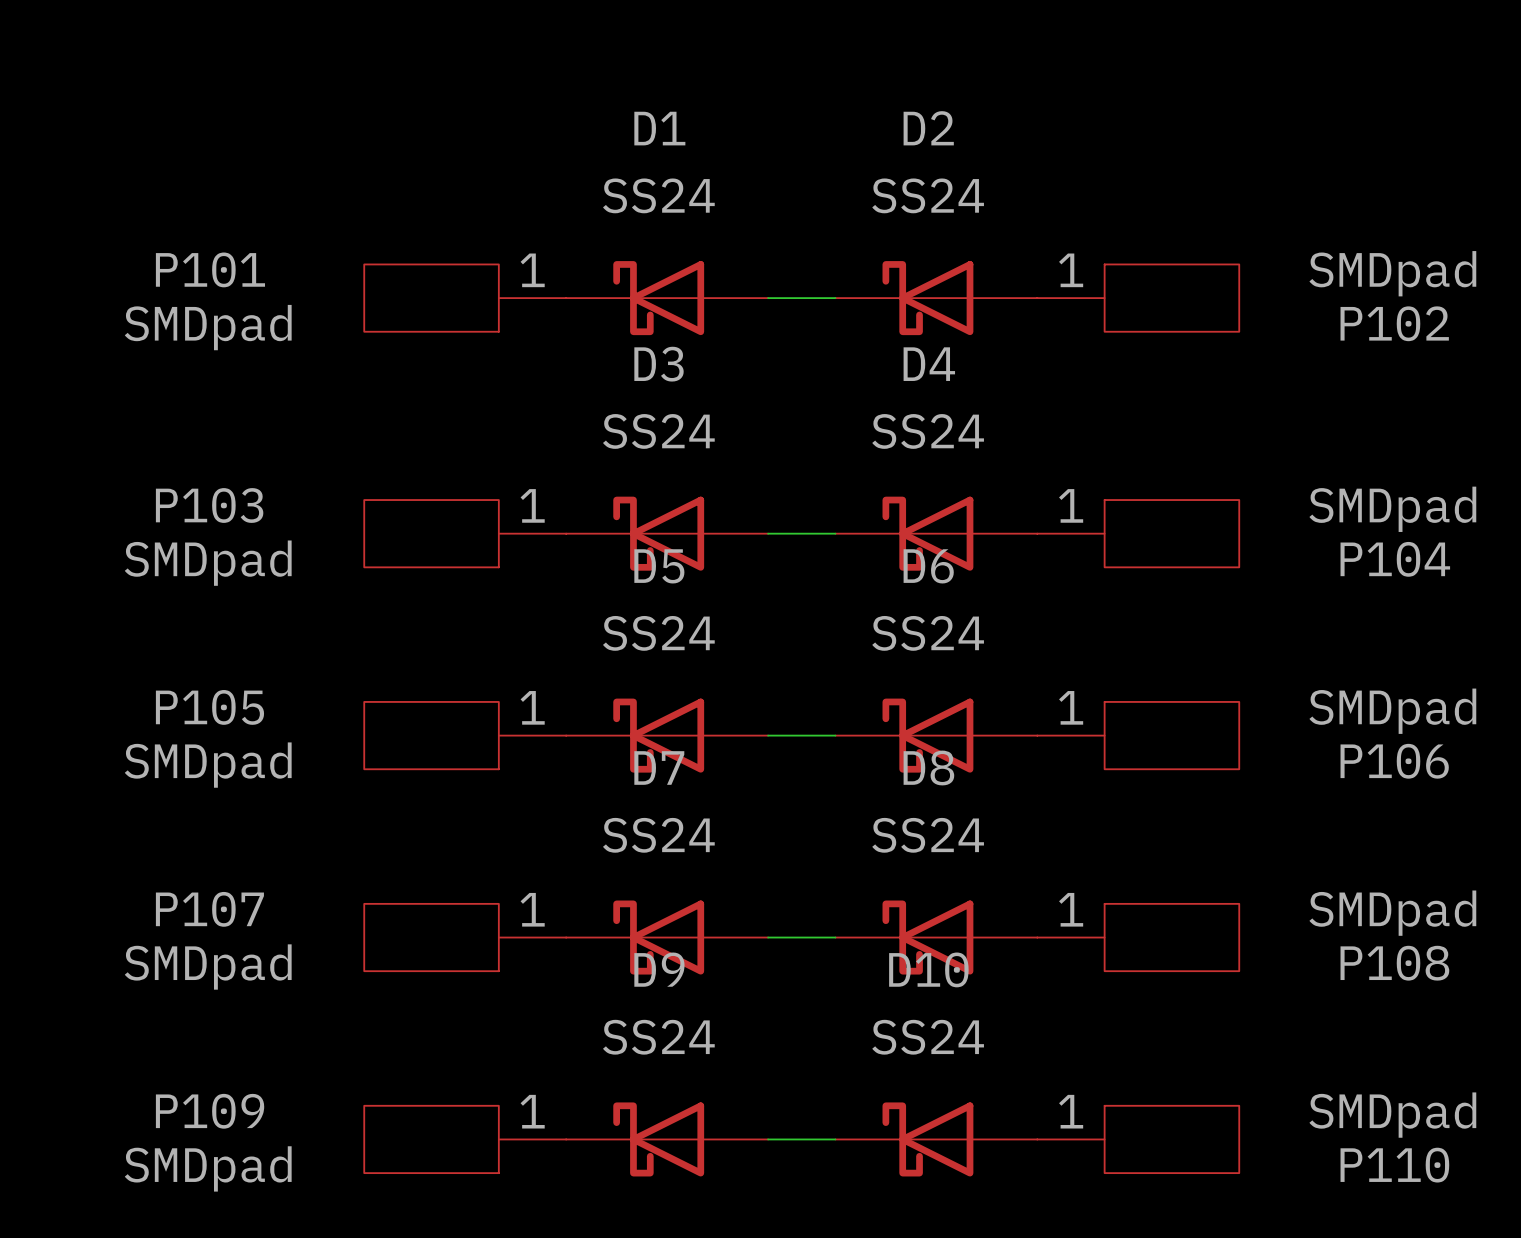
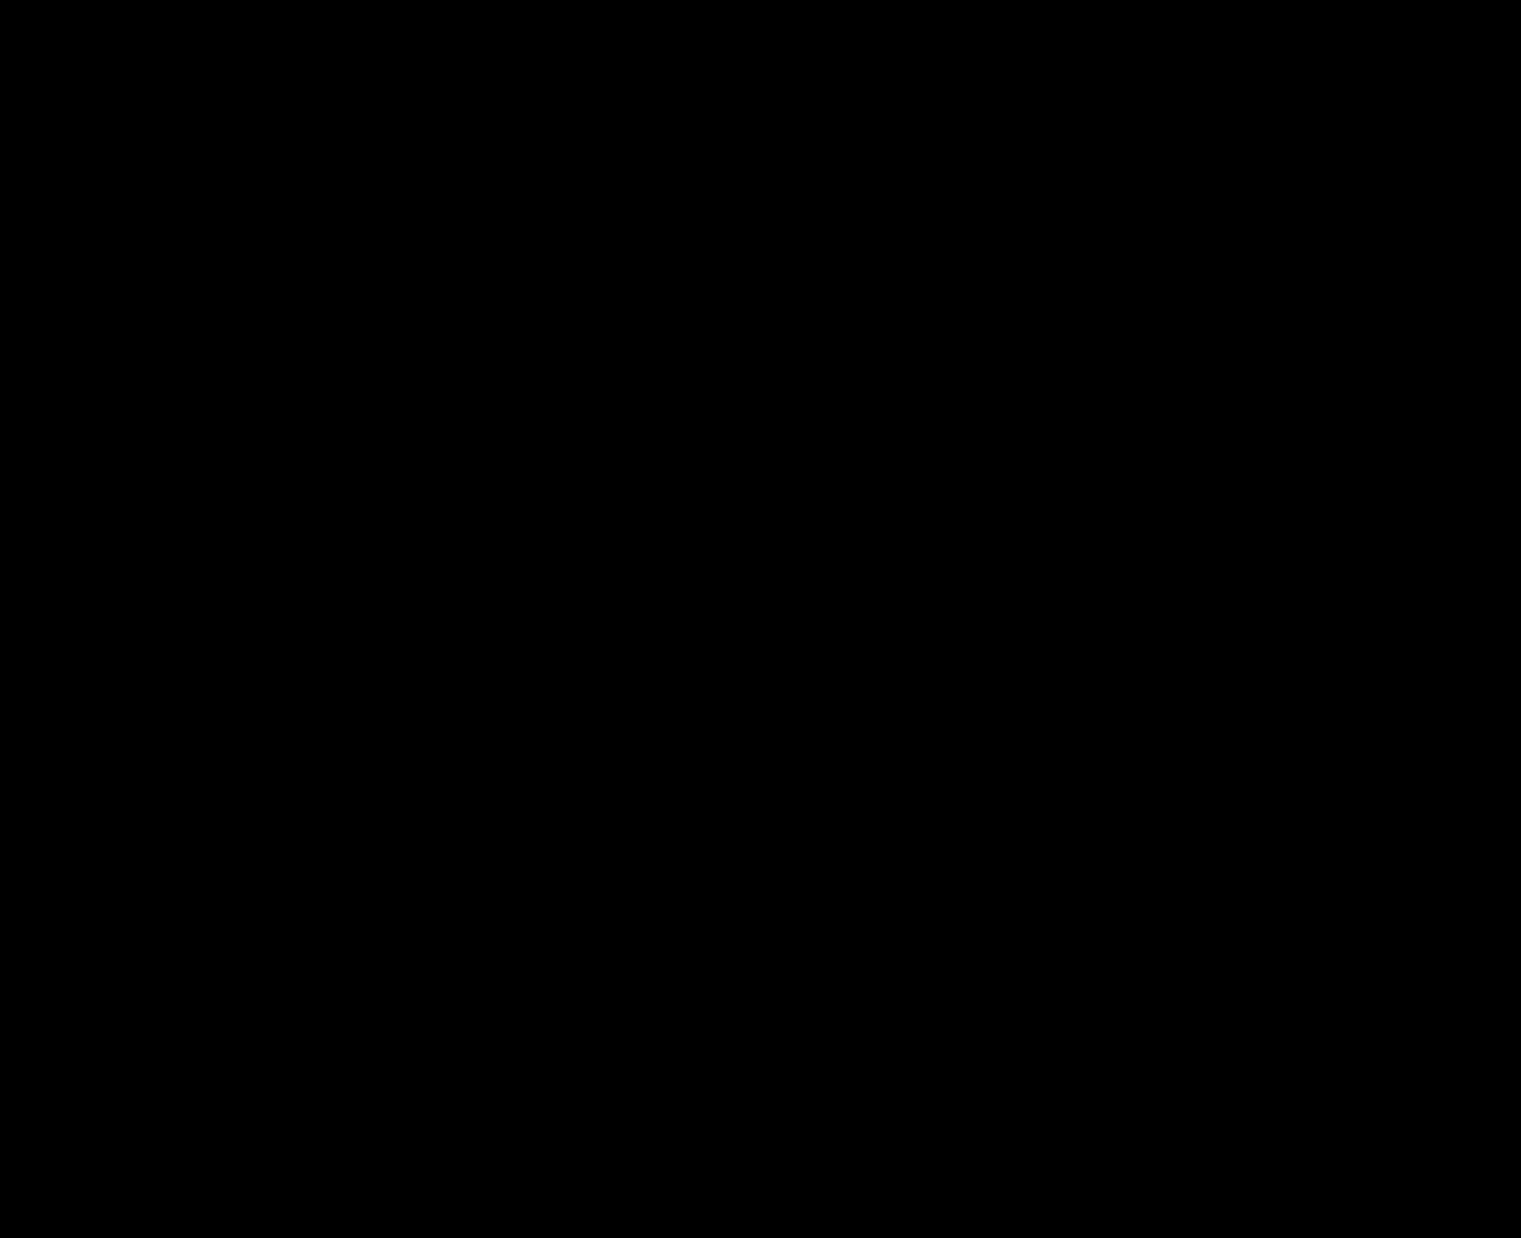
P101: SMDpad (465, 298) -> none
D1: SS24 (667, 298) -> none
wire: (768, 298) (835, 298) -> none
D2: SS24 (936, 298) -> none
P102: SMDpad (1138, 298) -> none
P103: SMDpad (465, 533) -> none
D3: SS24 (667, 533) -> none
wire: (768, 533) (835, 533) -> none
D4: SS24 (936, 533) -> none
P104: SMDpad (1138, 533) -> none
P105: SMDpad (465, 735) -> none
D5: SS24 (667, 735) -> none
wire: (768, 735) (835, 735) -> none
D6: SS24 (936, 735) -> none
P106: SMDpad (1138, 735) -> none
P107: SMDpad (465, 937) -> none
D7: SS24 (667, 937) -> none
wire: (768, 937) (835, 937) -> none
D8: SS24 (936, 937) -> none
P108: SMDpad (1138, 937) -> none
P109: SMDpad (465, 1139) -> none
D9: SS24 (667, 1139) -> none
wire: (768, 1139) (835, 1139) -> none
D10: SS24 (936, 1139) -> none
P110: SMDpad (1138, 1139) -> none

